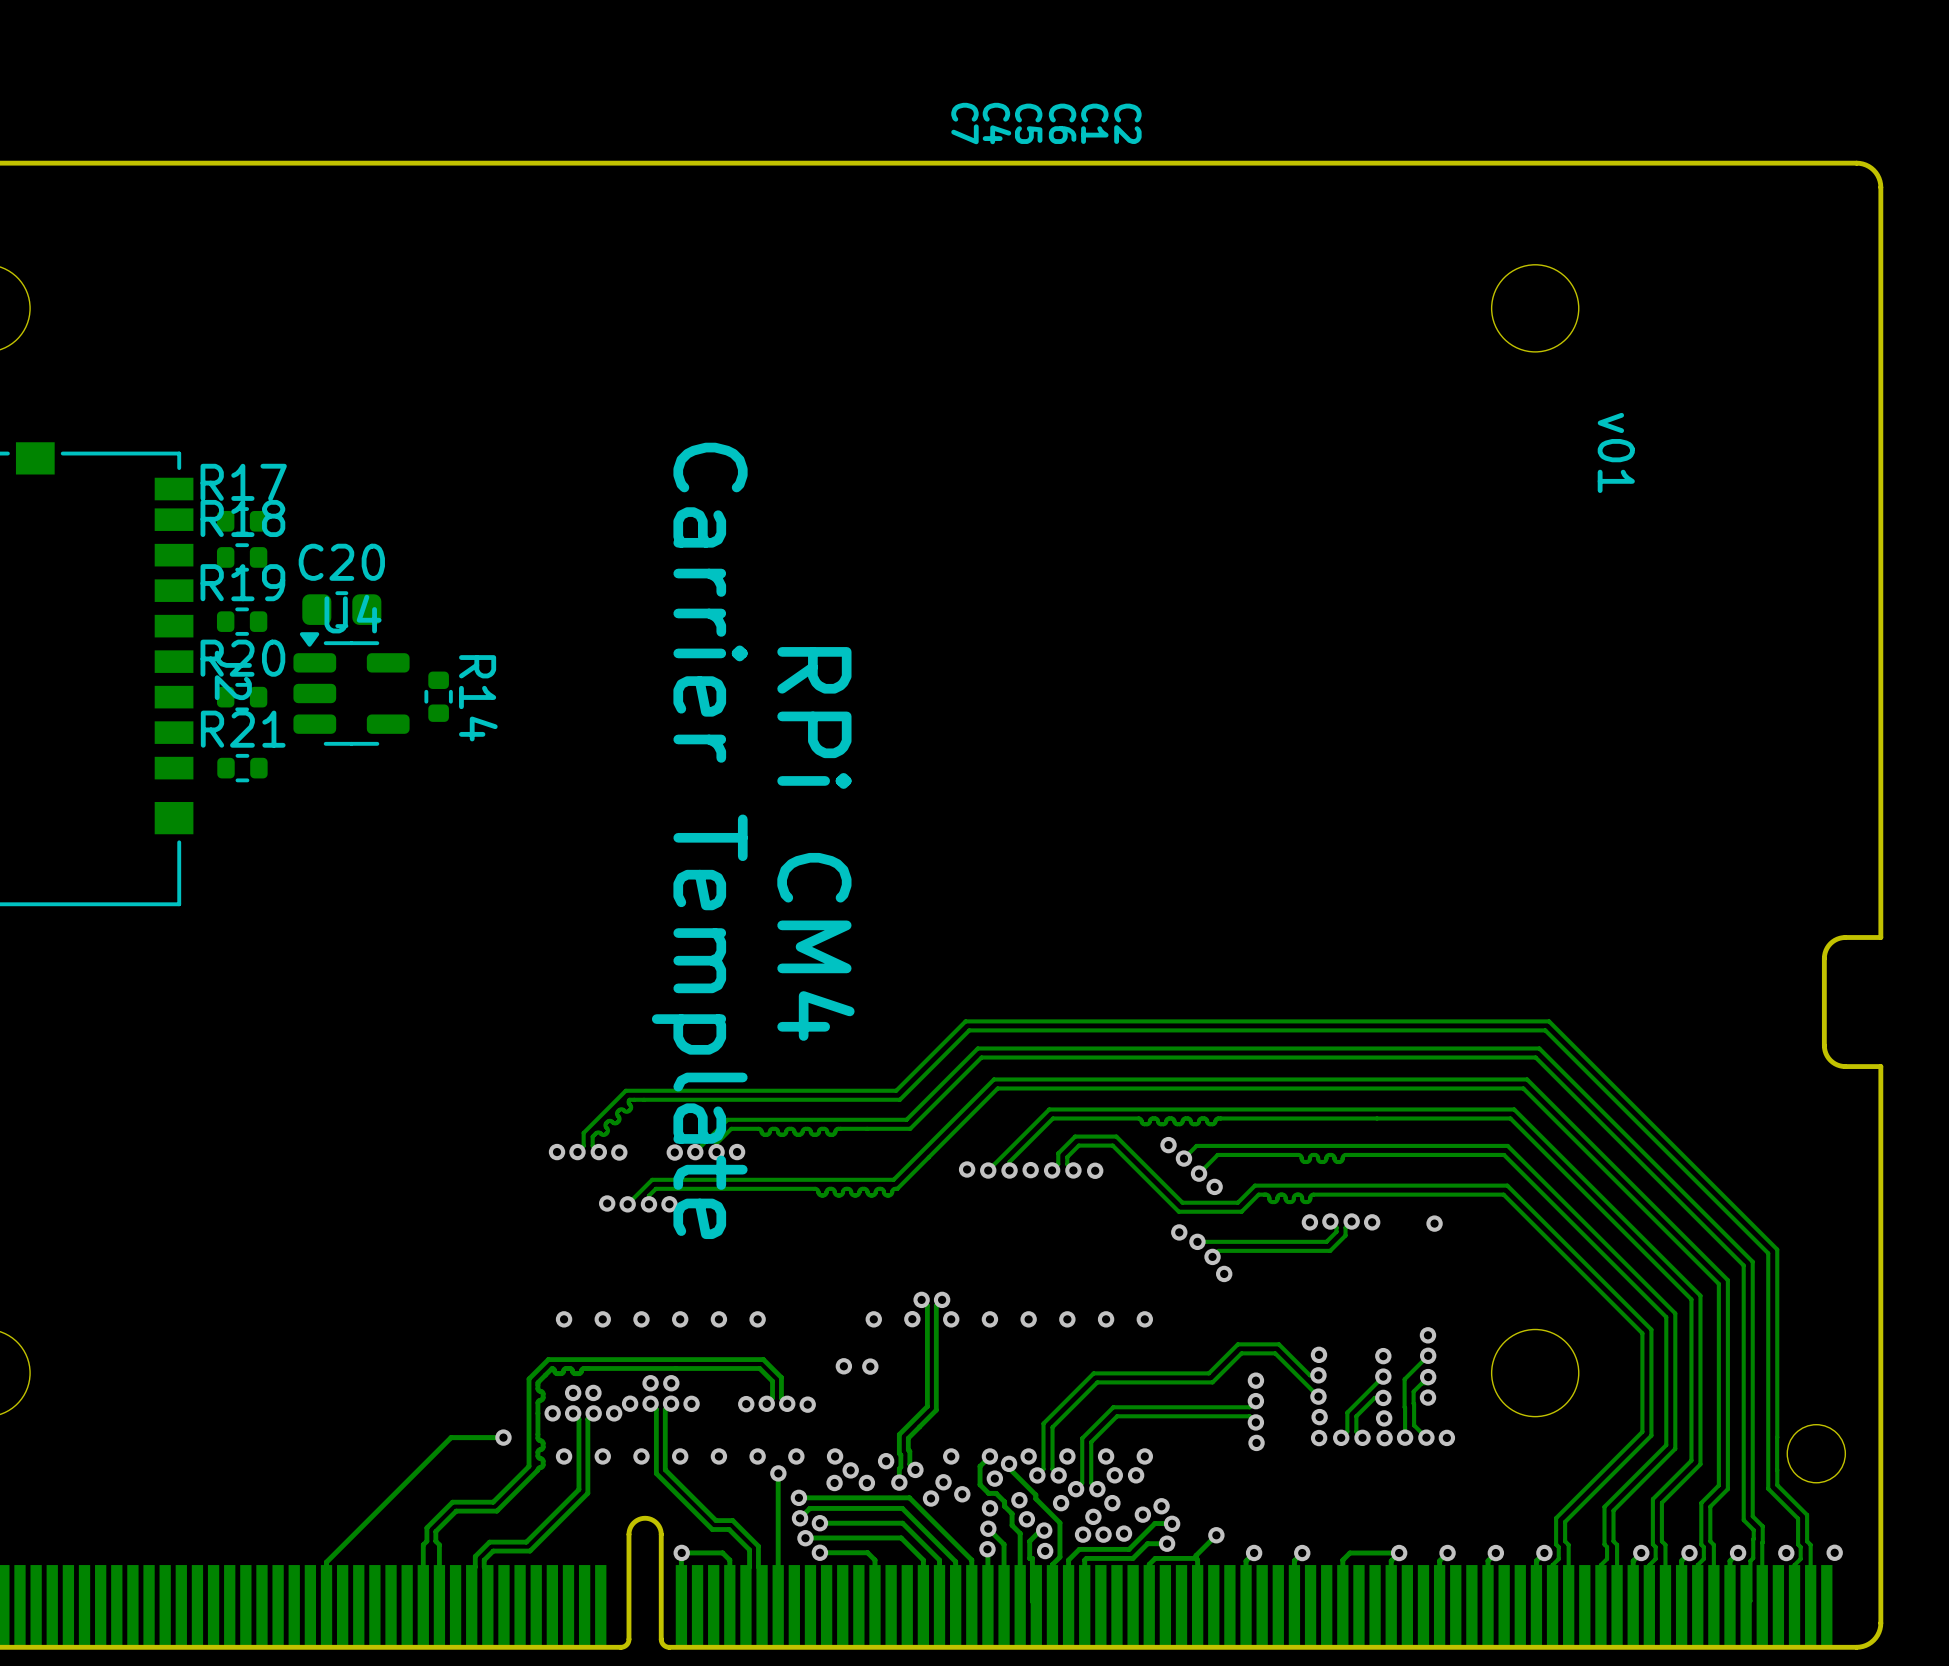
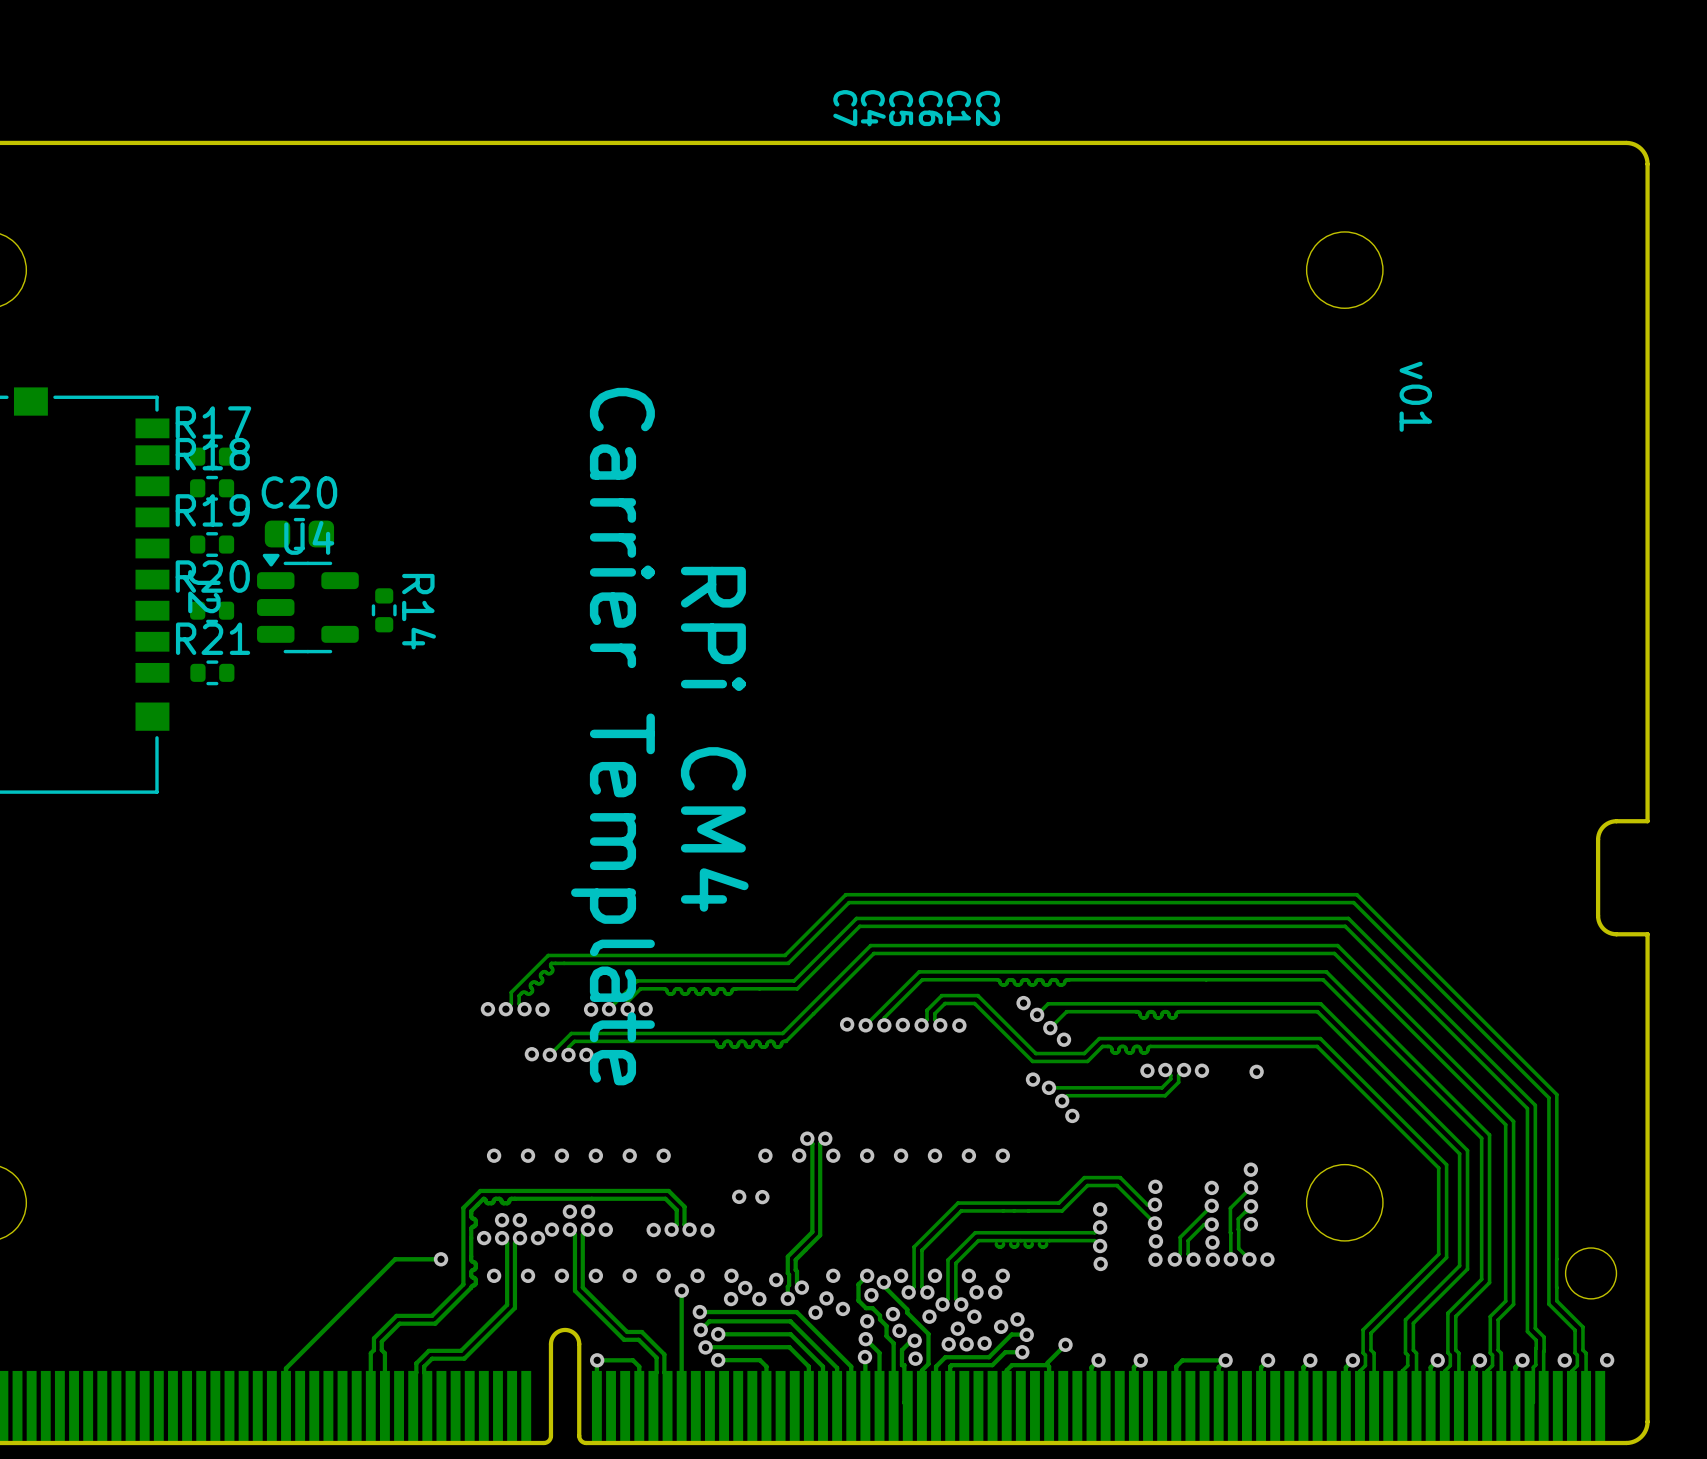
track: none -> (1003, 1244) (1000, 1246) (996, 1244)
track: none -> (1017, 1244) (1015, 1246) (1010, 1244)
track: none -> (1032, 1244) (1029, 1246) (1025, 1244)
track: none -> (1046, 1244) (1043, 1246) (1039, 1244)

